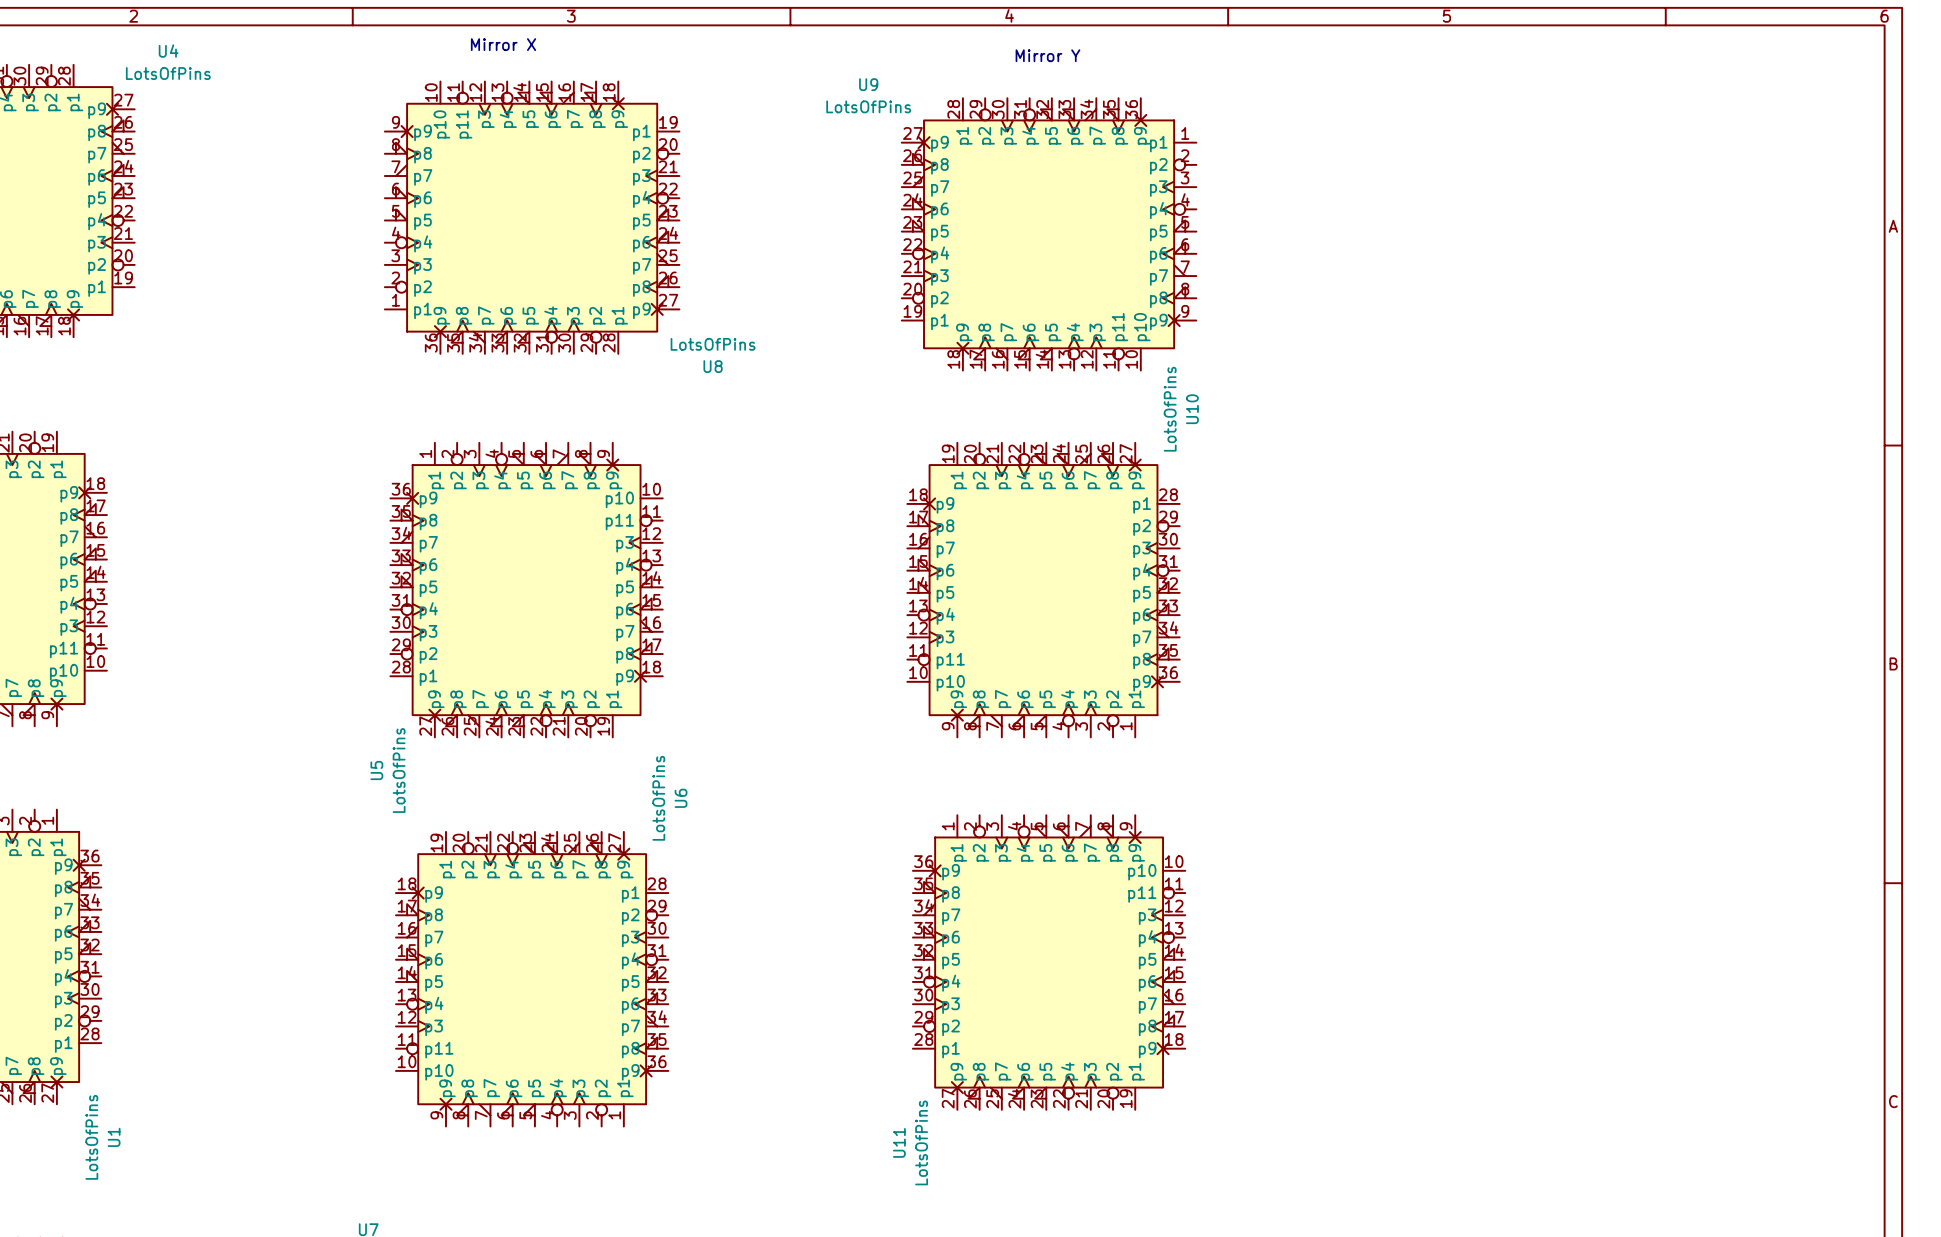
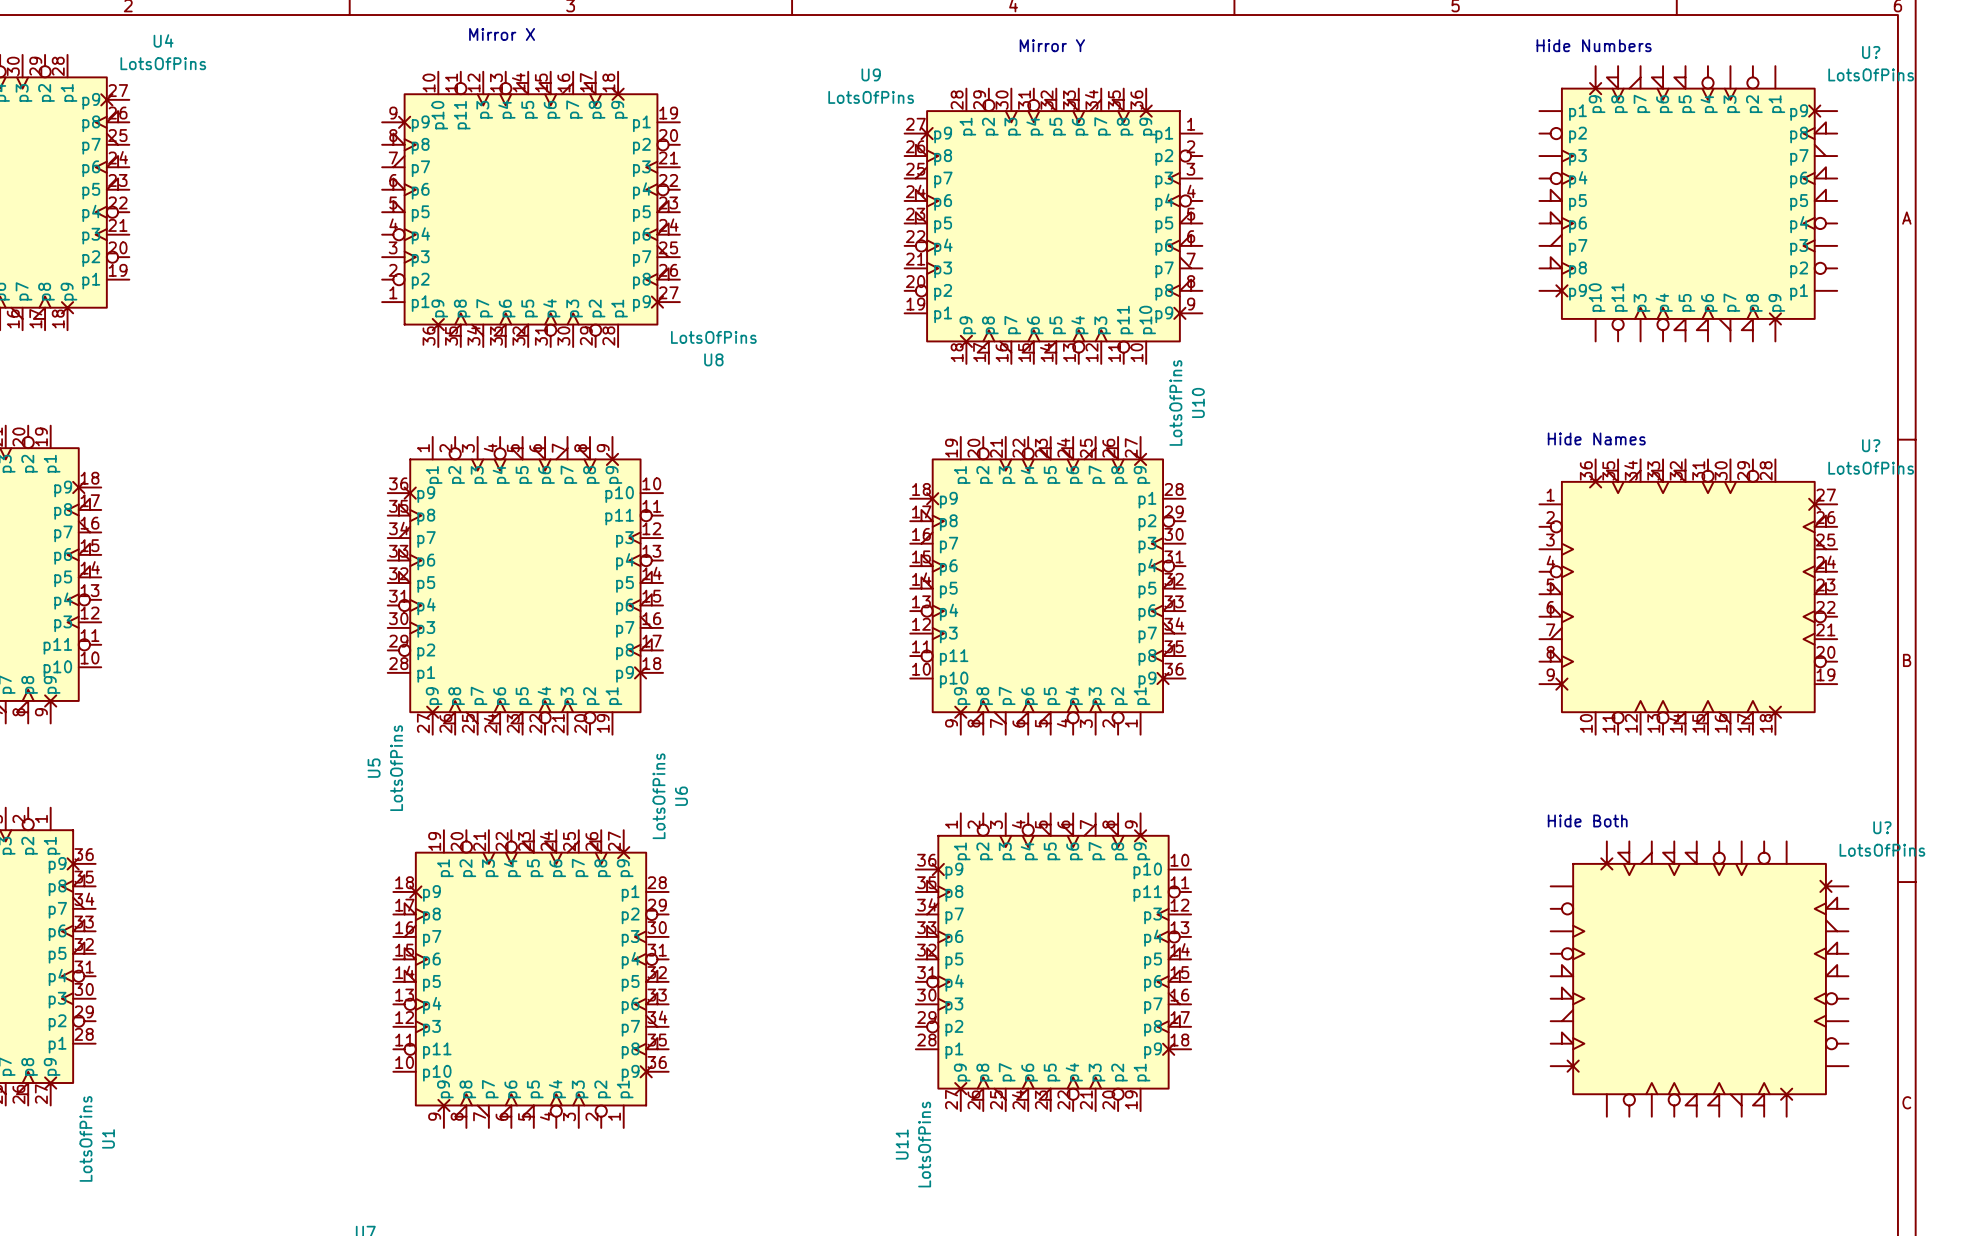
text: none -> Hide Numbers (1594, 45)
U?: none -> LotsOfPins (1688, 203)
text: none -> Hide Names (1596, 438)
U?: none -> LotsOfPins (1688, 597)
text: none -> Hide Both (1587, 820)
U?: none -> LotsOfPins (1699, 979)

